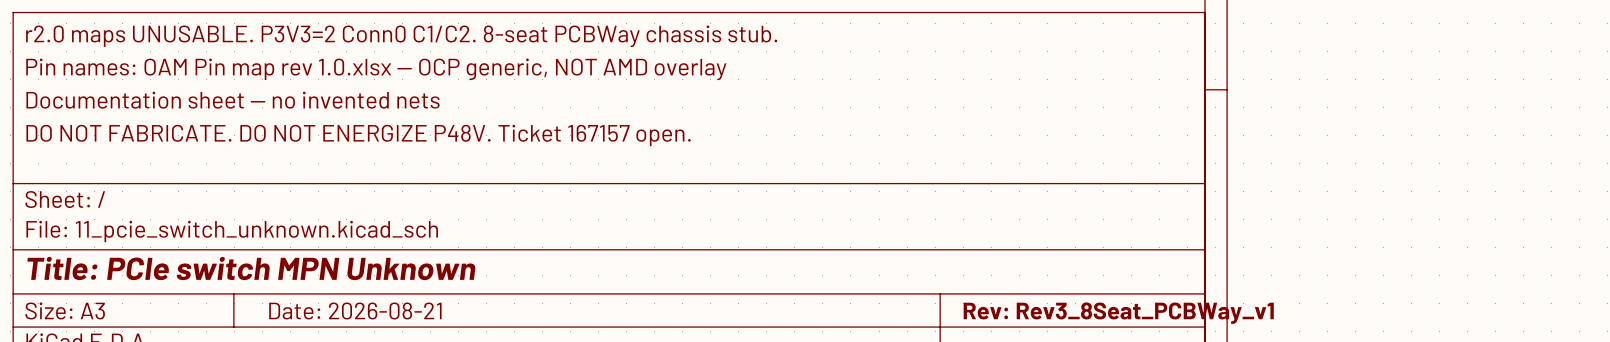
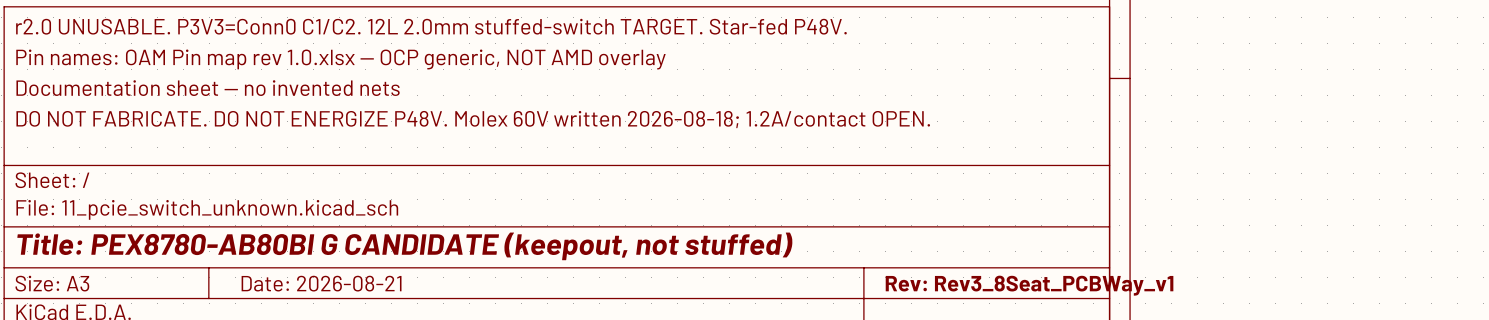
title block: r2.0 maps UNUSABLE. P3V3=2 Conn0 C1/C2. 8-seat PCBWay chassis stub. (401, 36) -> r2.0 UNUSABLE. P3V3=Conn0 C1/C2. 12L 2.0mm stuffed-switch TARGET. Star-fed P48V. (431, 26)
title block: DO NOT FABRICATE. DO NOT ENERGIZE P48V. Ticket 167157 open. (358, 135) -> DO NOT FABRICATE. DO NOT ENERGIZE P48V. Molex 60V written 2026-08-18; 1.2A/contact OPEN. (473, 119)
title block: Title: PCIe switch MPN Unknown (251, 268) -> Title: PEX8780-AB80BI G CANDIDATE (keepout, not stuffed) (404, 246)

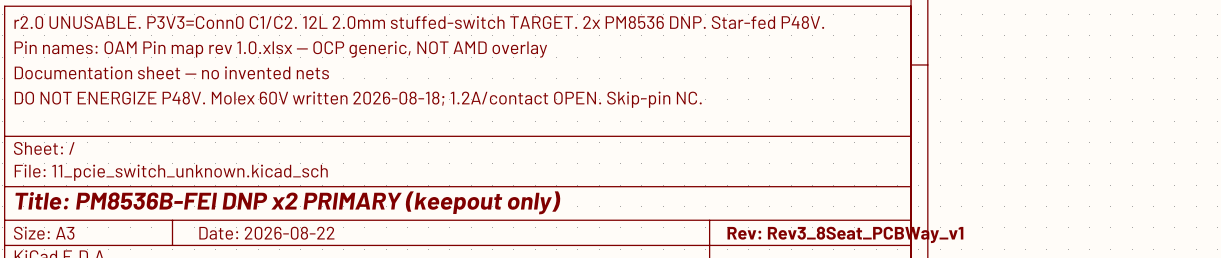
title block: r2.0 UNUSABLE. P3V3=Conn0 C1/C2. 12L 2.0mm stuffed-switch TARGET. Star-fed P48V. (431, 26) -> r2.0 UNUSABLE. P3V3=Conn0 C1/C2. 12L 2.0mm stuffed-switch TARGET. 2x PM8536 DNP. Star-fed P48V. (419, 22)
title block: DO NOT FABRICATE. DO NOT ENERGIZE P48V. Molex 60V written 2026-08-18; 1.2A/contact OPEN. (473, 119) -> DO NOT ENERGIZE P48V. Molex 60V written 2026-08-18; 1.2A/contact OPEN. Skip-pin NC. (358, 99)
title block: Title: PEX8780-AB80BI G CANDIDATE (keepout, not stuffed) (404, 246) -> Title: PM8536B-FEI DNP x2 PRIMARY (keepout only) (287, 202)
title block: Date: 2026-08-21 (321, 283) -> Date: 2026-08-22 (266, 233)

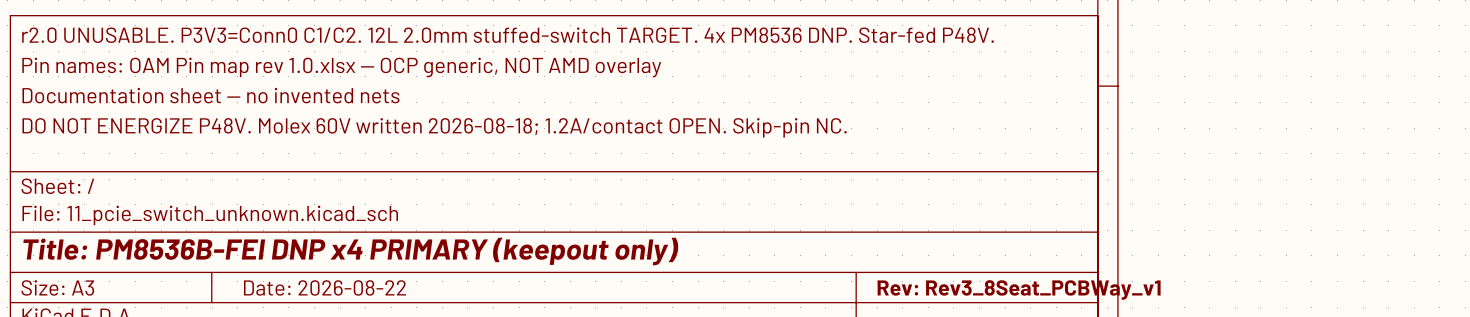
title block: r2.0 UNUSABLE. P3V3=Conn0 C1/C2. 12L 2.0mm stuffed-switch TARGET. 2x PM8536 DNP. Star-fed P48V. (419, 22) -> r2.0 UNUSABLE. P3V3=Conn0 C1/C2. 12L 2.0mm stuffed-switch TARGET. 4x PM8536 DNP. Star-fed P48V. (508, 35)
title block: Title: PM8536B-FEI DNP x2 PRIMARY (keepout only) (287, 202) -> Title: PM8536B-FEI DNP x4 PRIMARY (keepout only) (350, 251)

